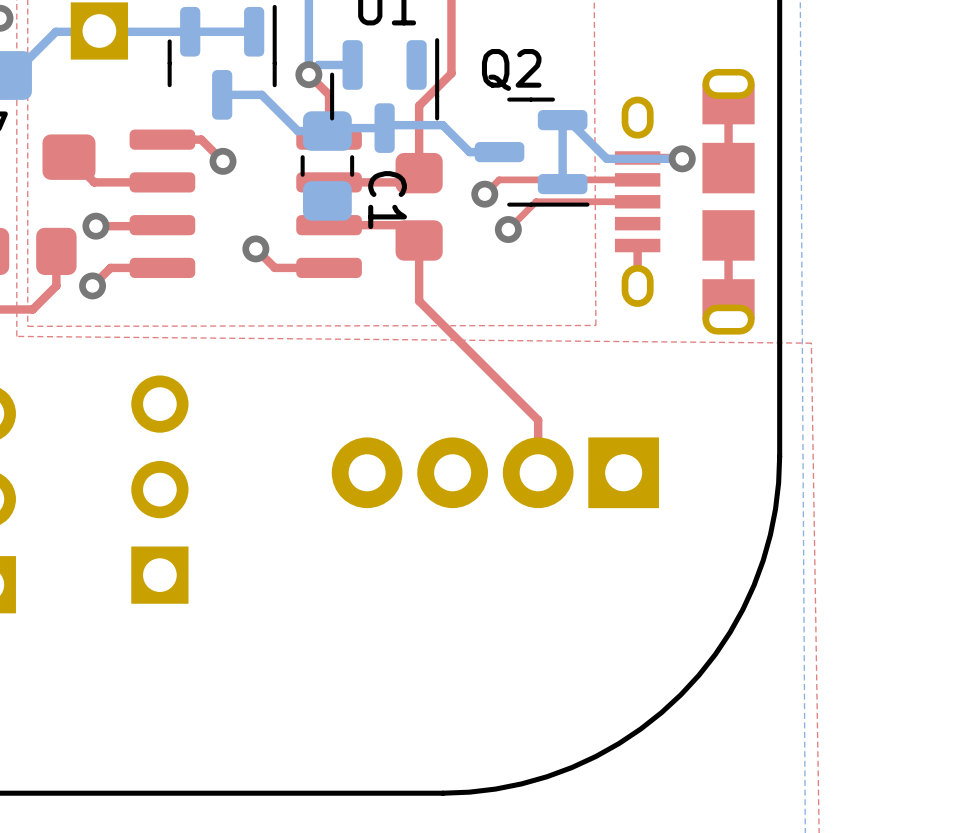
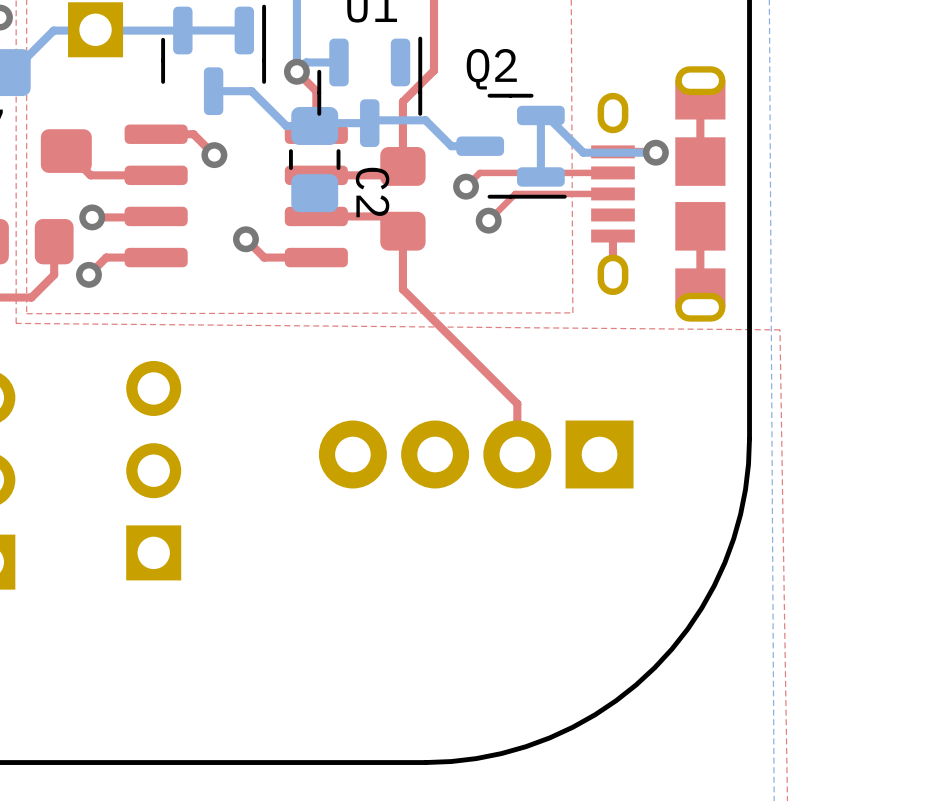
C1 name: C1 (387, 200) -> C2 (372, 192)

